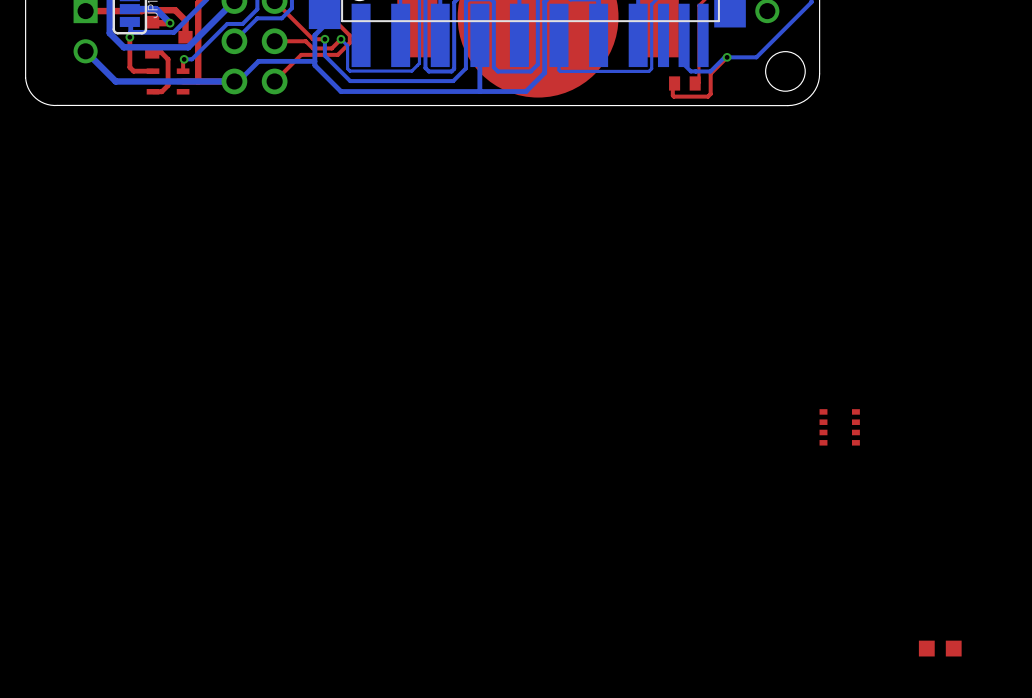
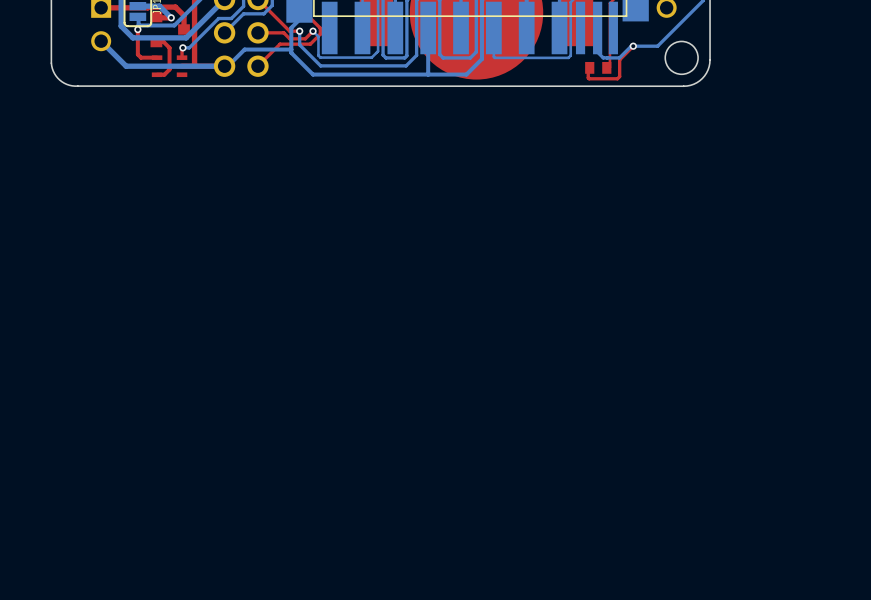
part: (839, 427) -> none
part: (940, 648) -> none

